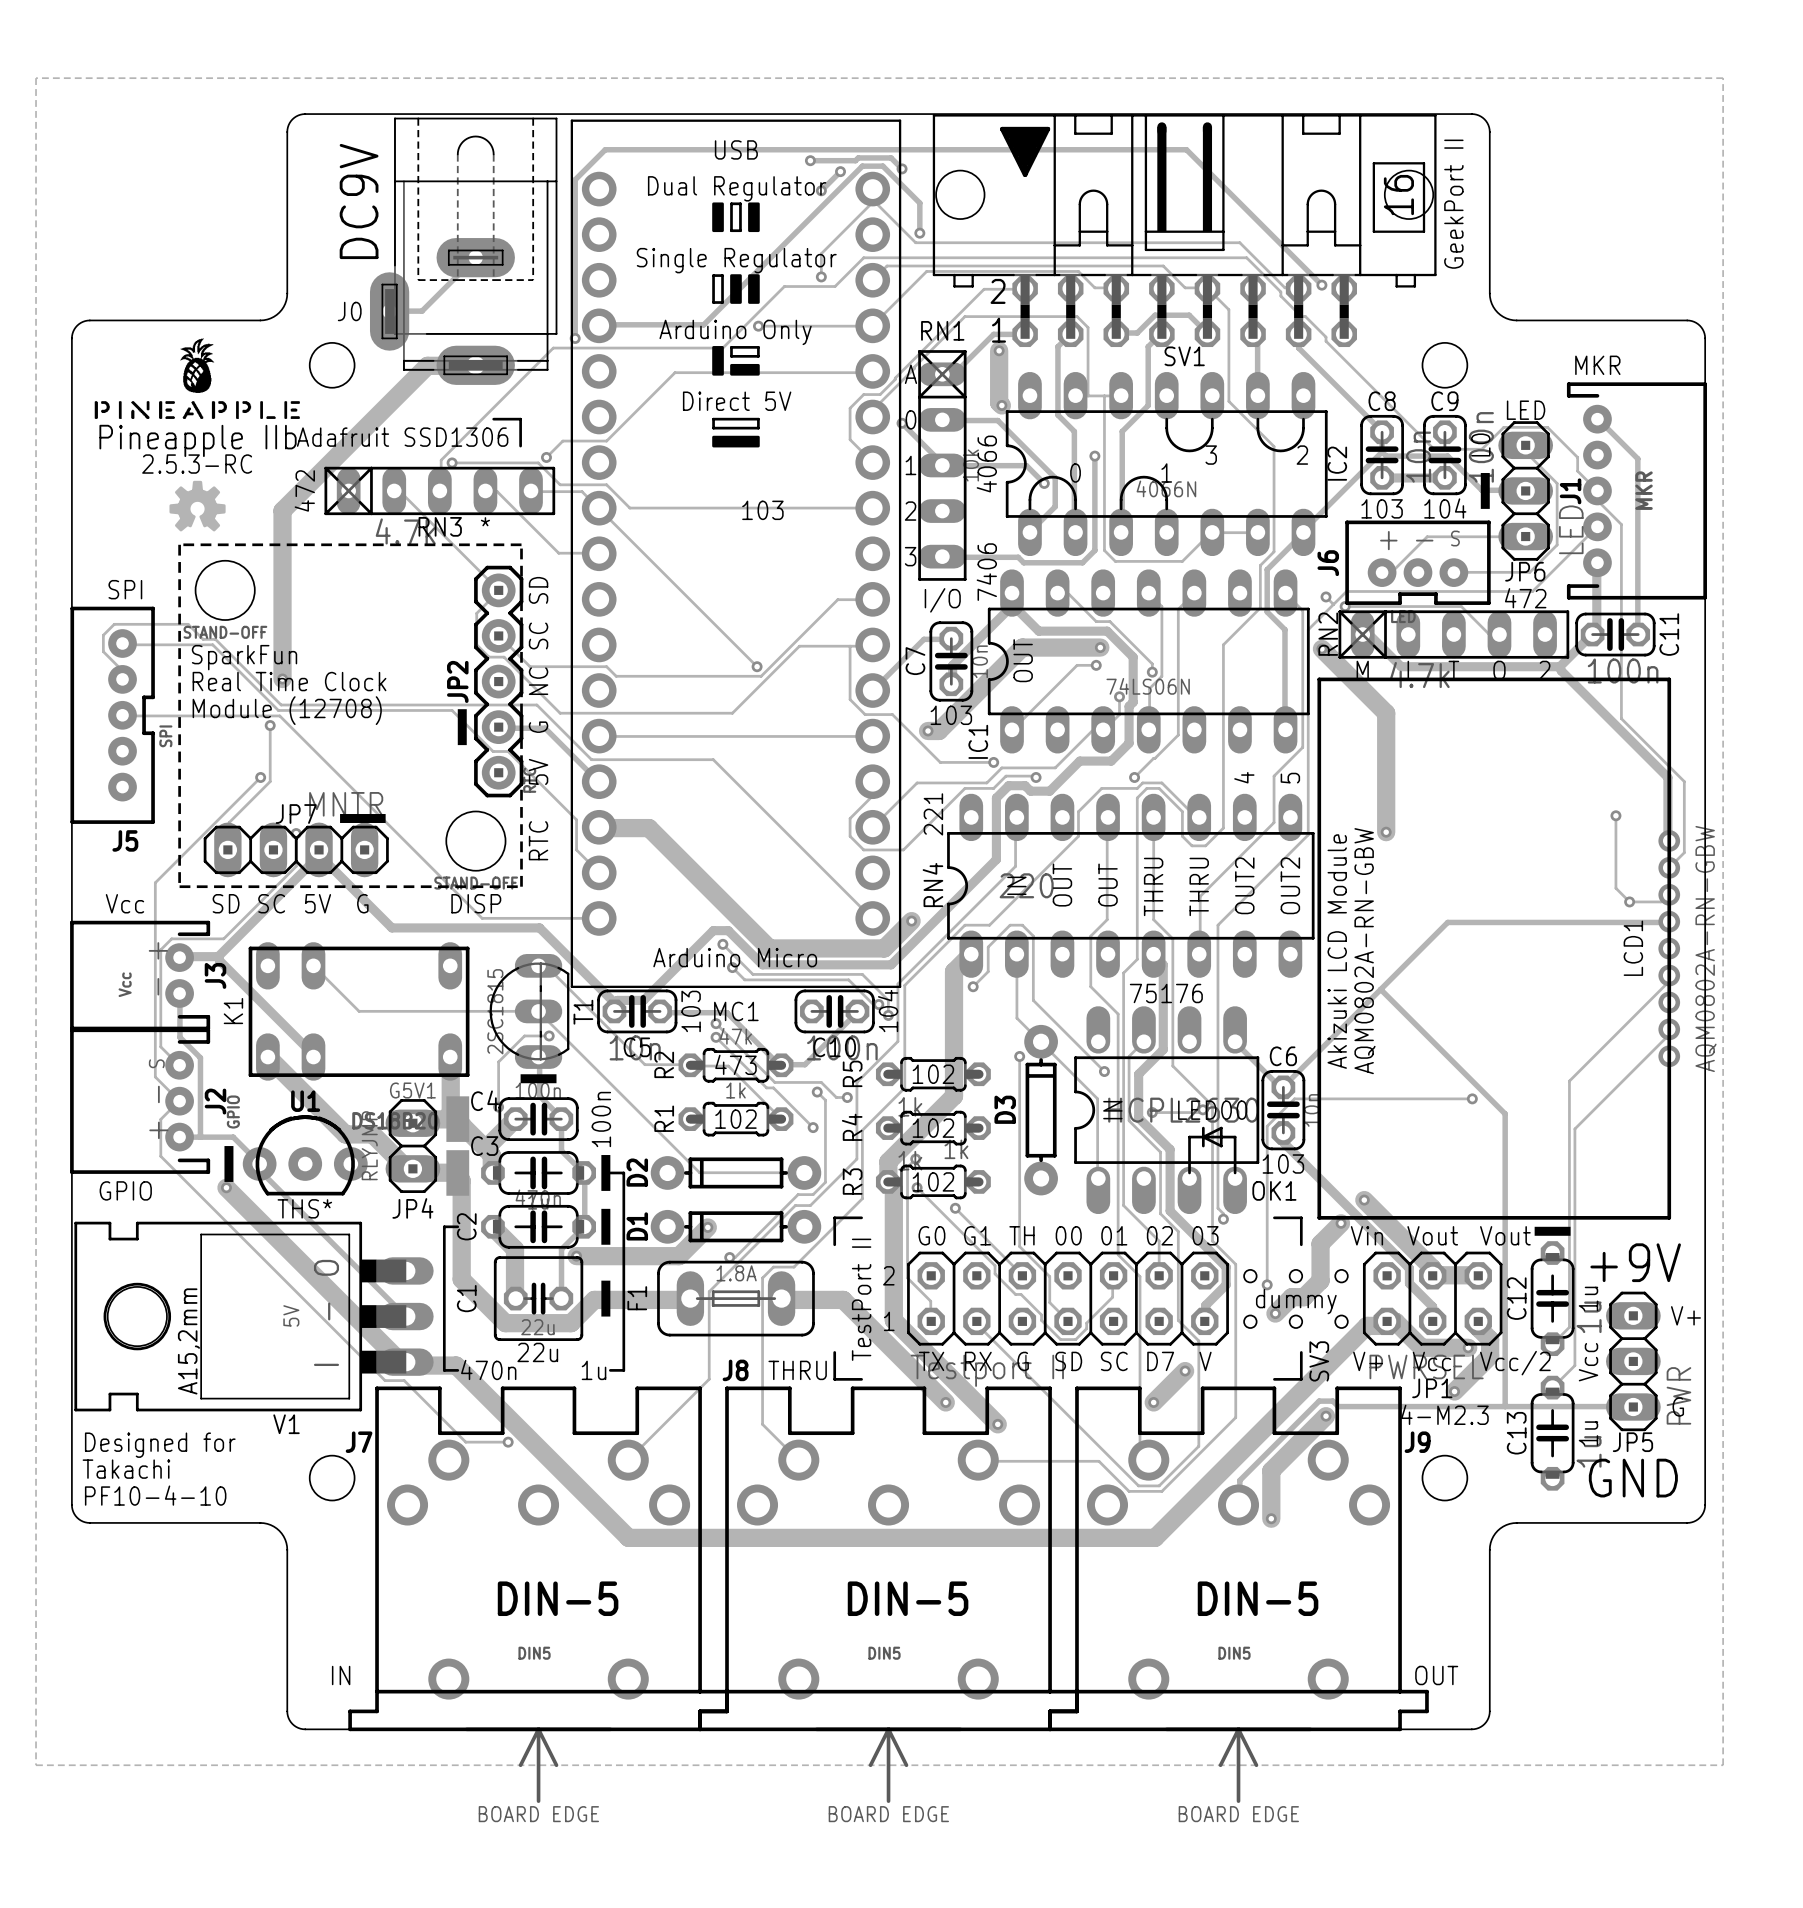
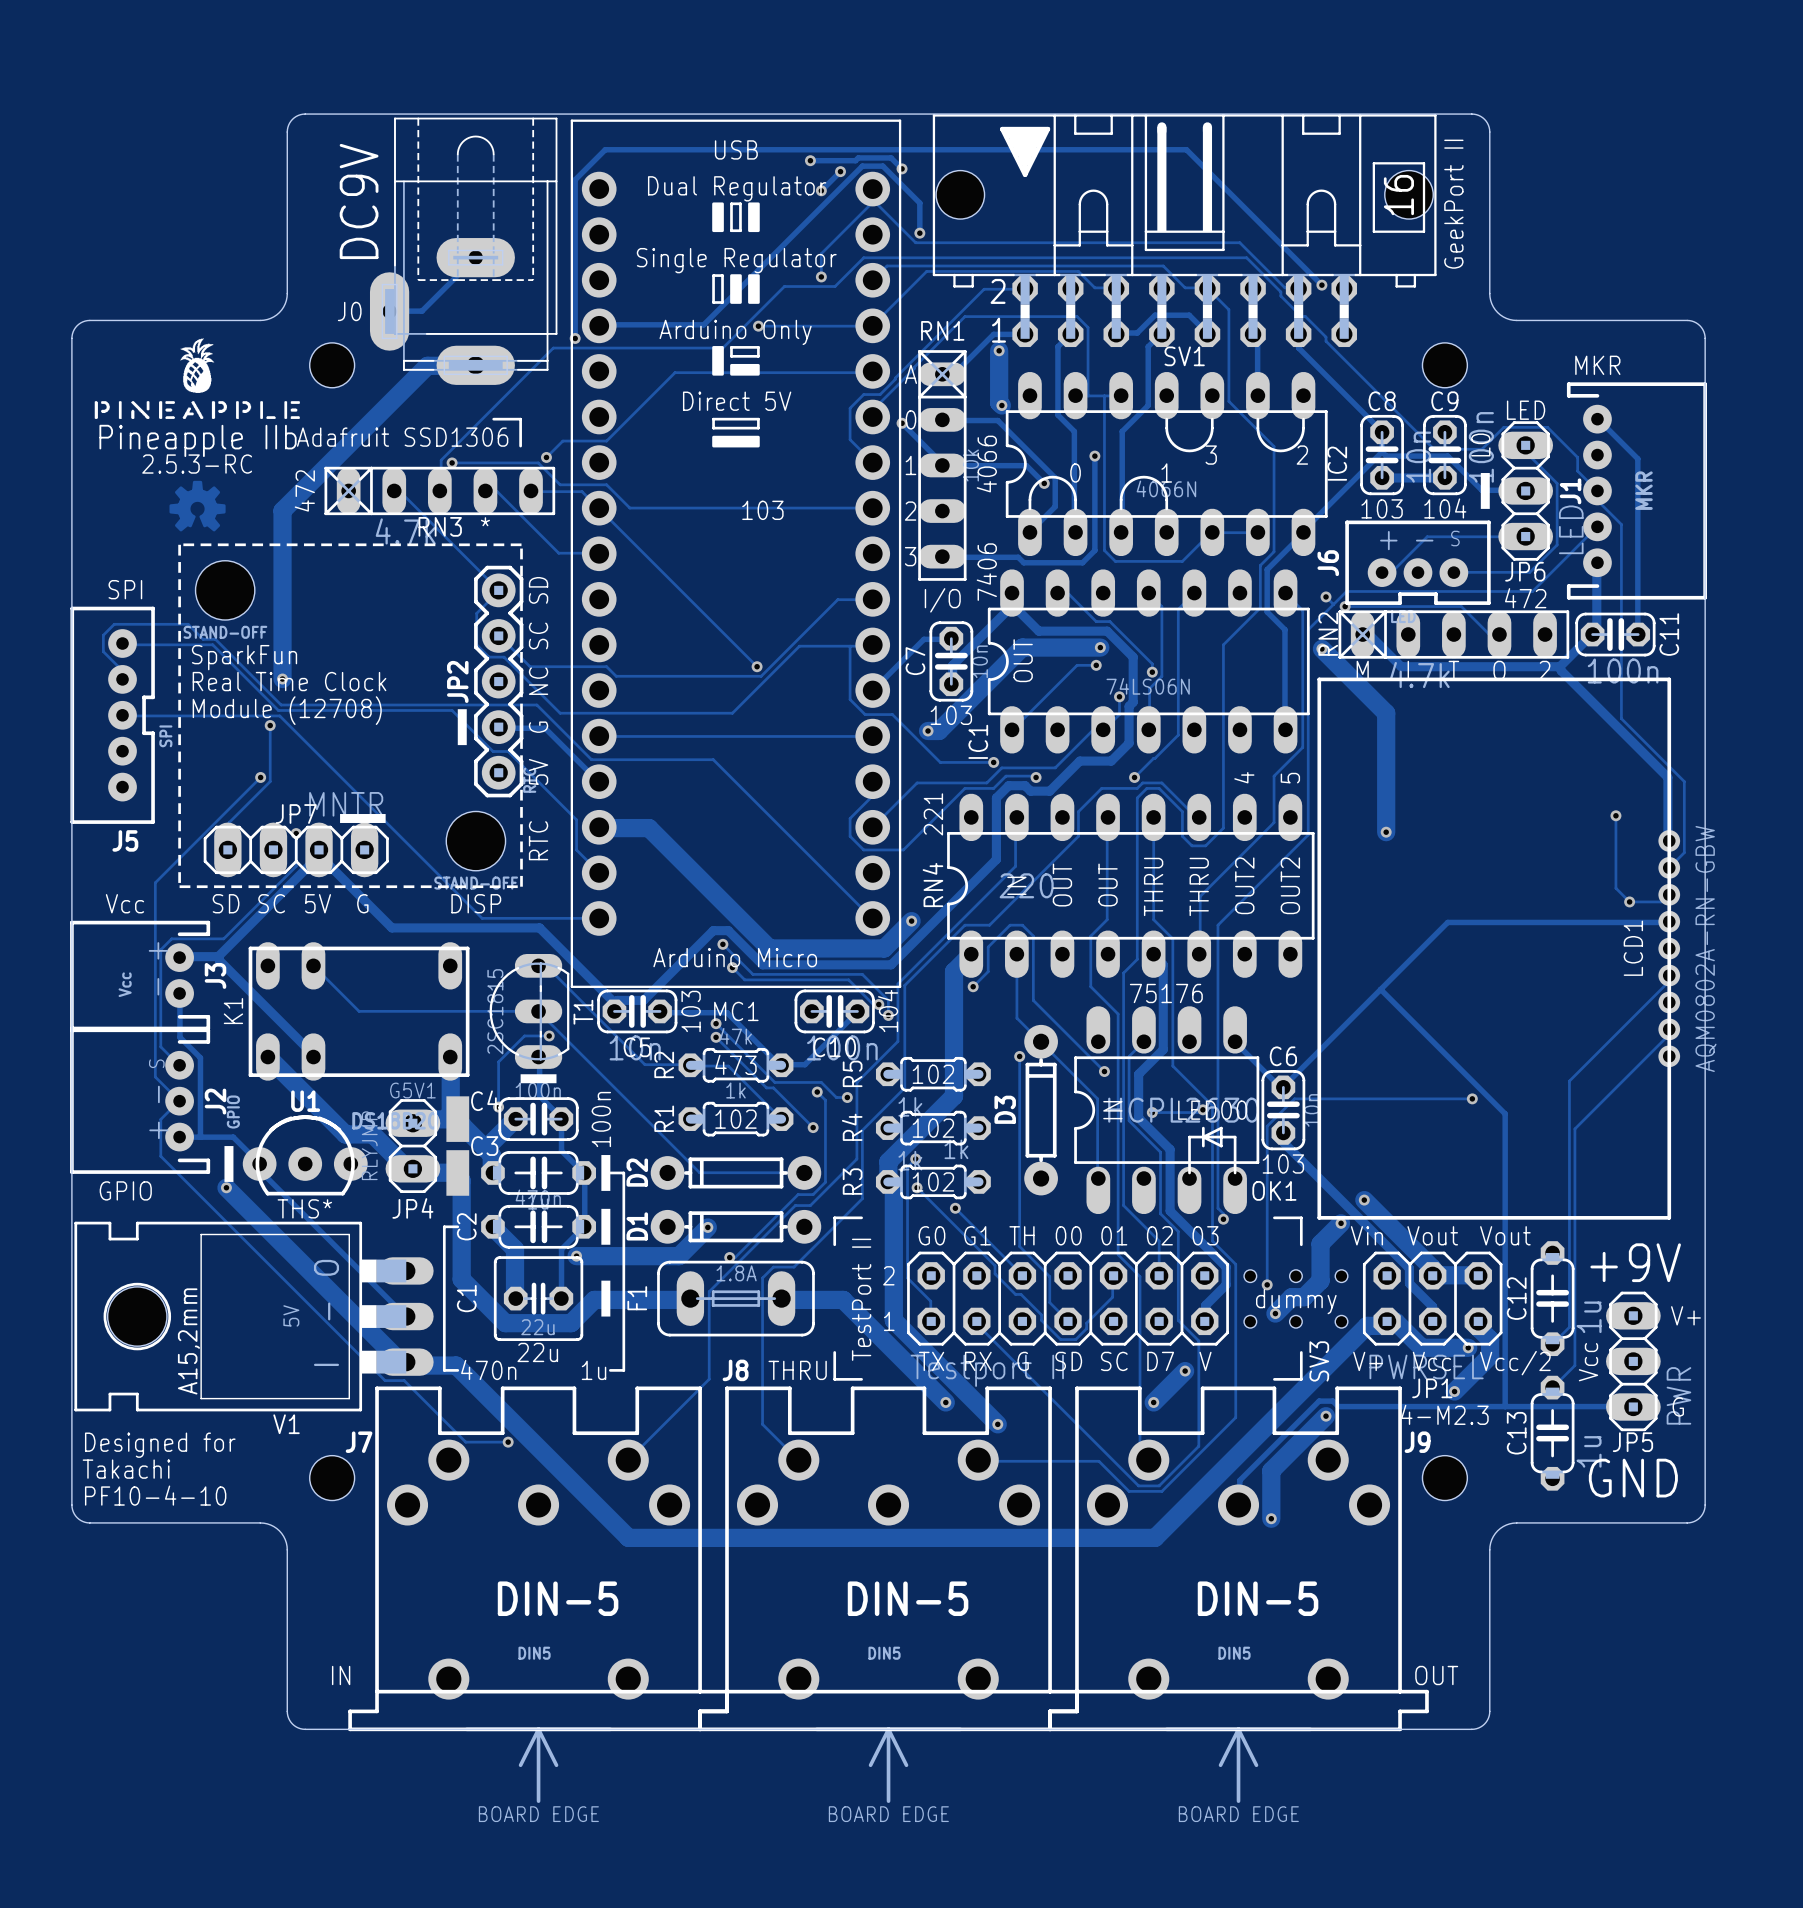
zone outline: (36, 78) (1723, 78) (1723, 1765) (36, 1765) (36, 78) -> none
text: Akizuki LCD Module (1337, 951) -> none
text: AQM0802A-RN-GBW (1365, 951) -> none
drawing: [1534, 1226, 1571, 1236] -> none
text: 1u (1588, 1298) -> none
text: 1u (1588, 1433) -> none

